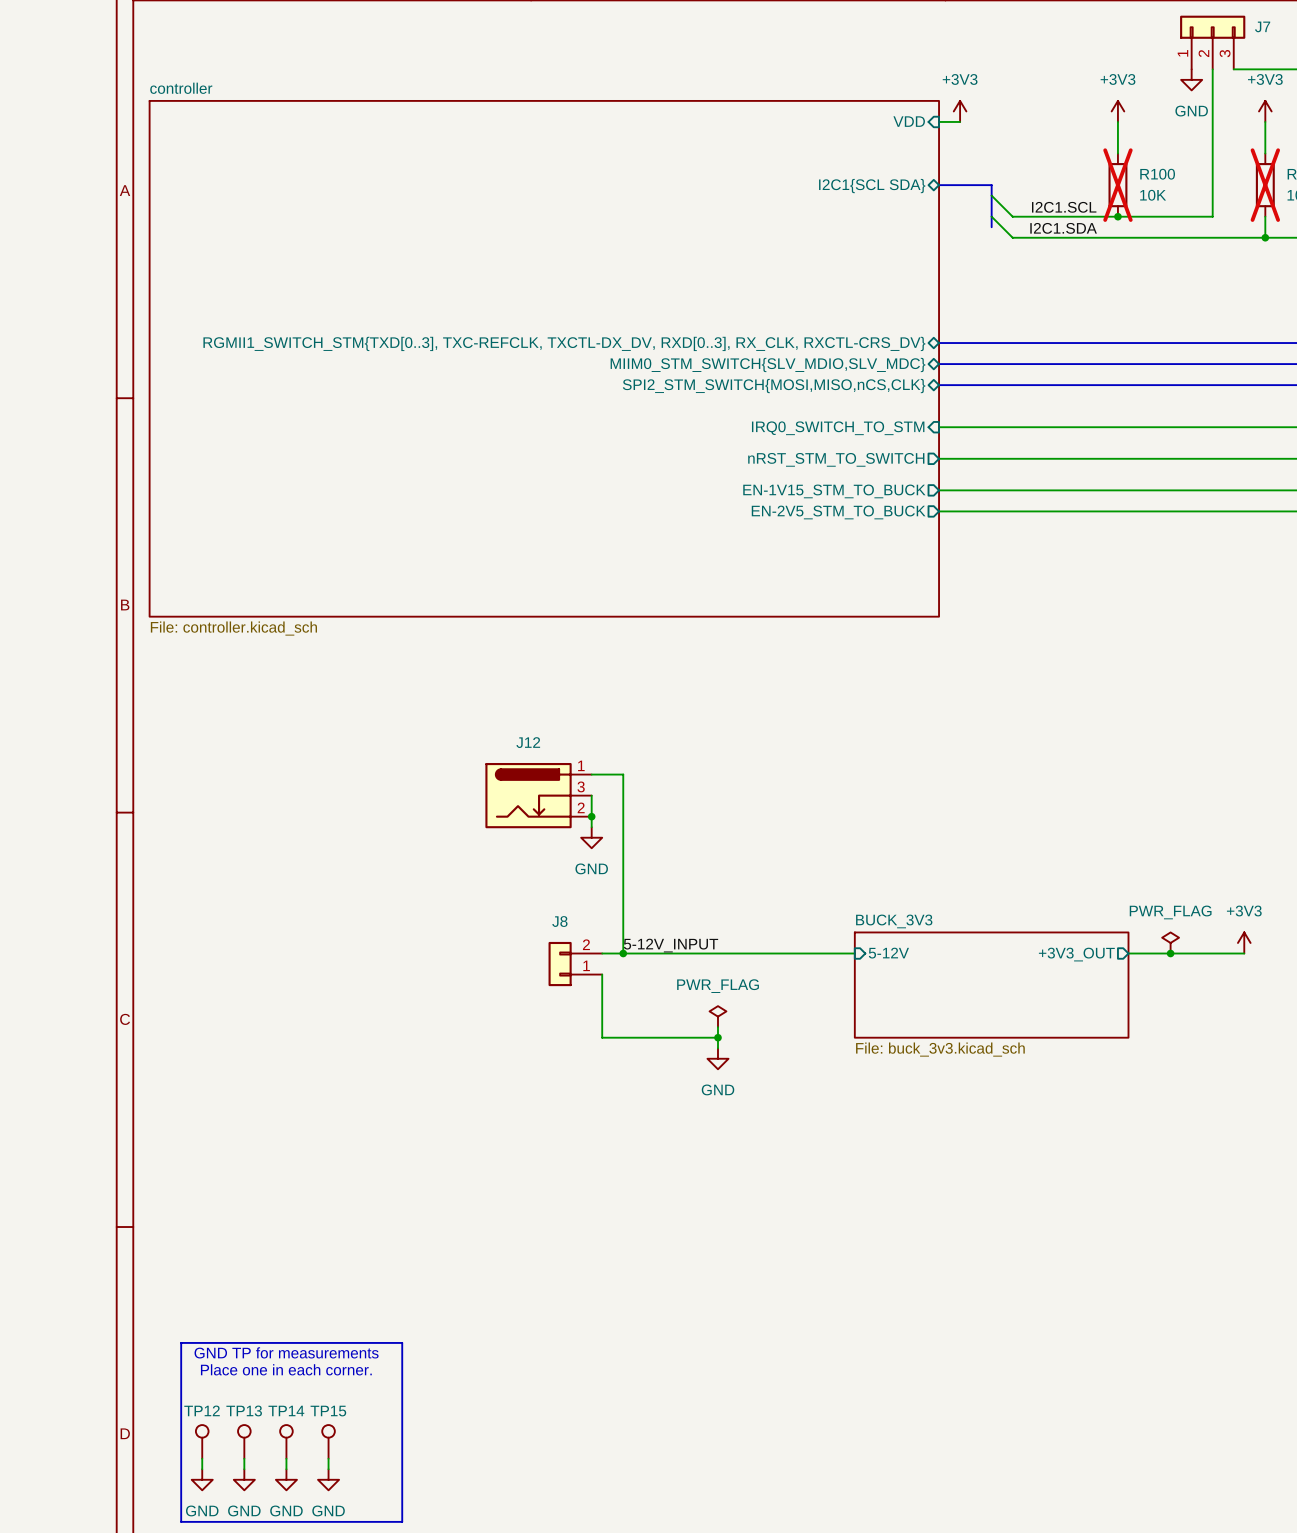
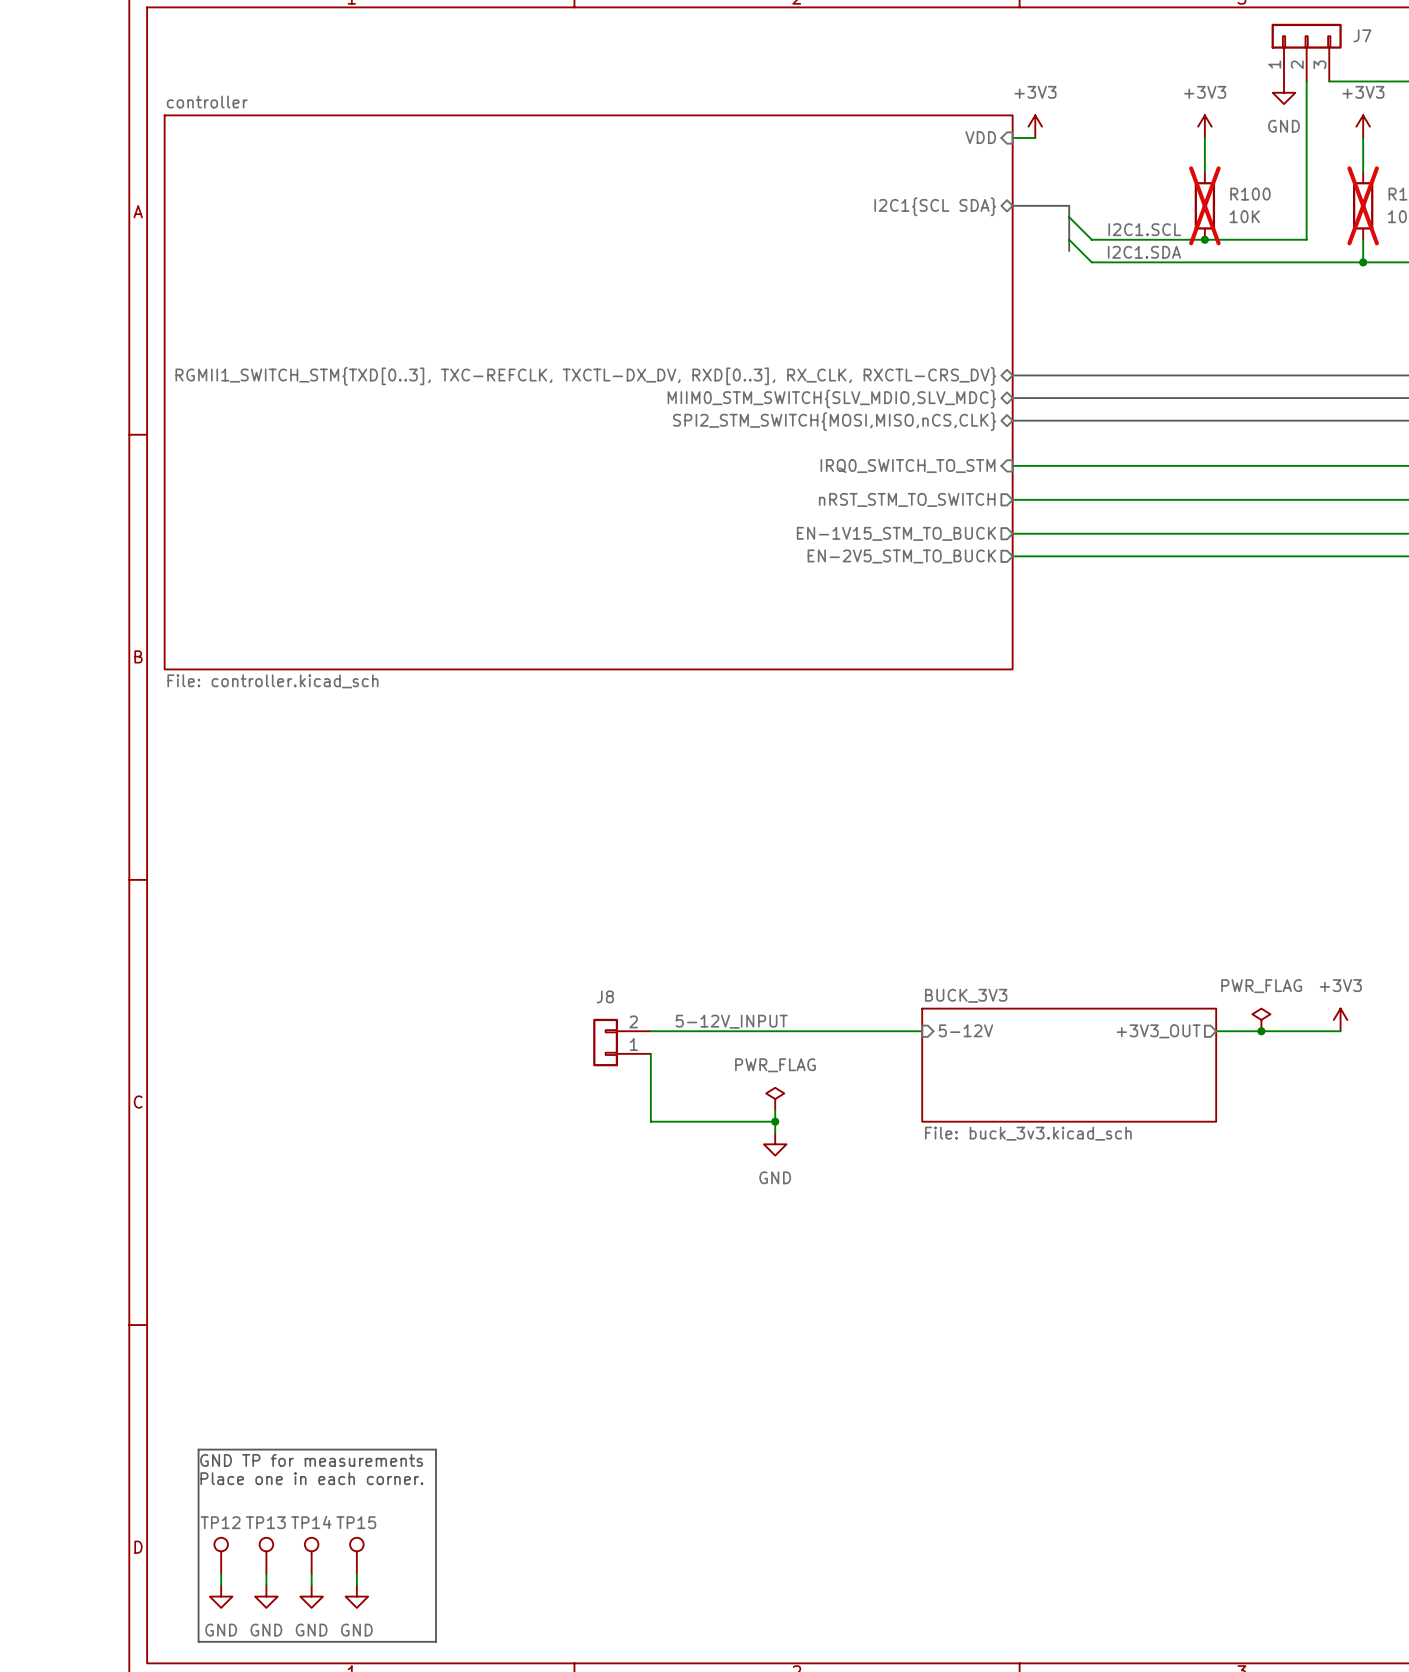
wire: (591, 774) (623, 774) (623, 953) -> none
J12: (538, 795) -> none
wire: (591, 795) (591, 827) -> none
junction: (591, 816) -> none
power symbol: GND (591, 837) -> none
junction: (623, 953) -> none

